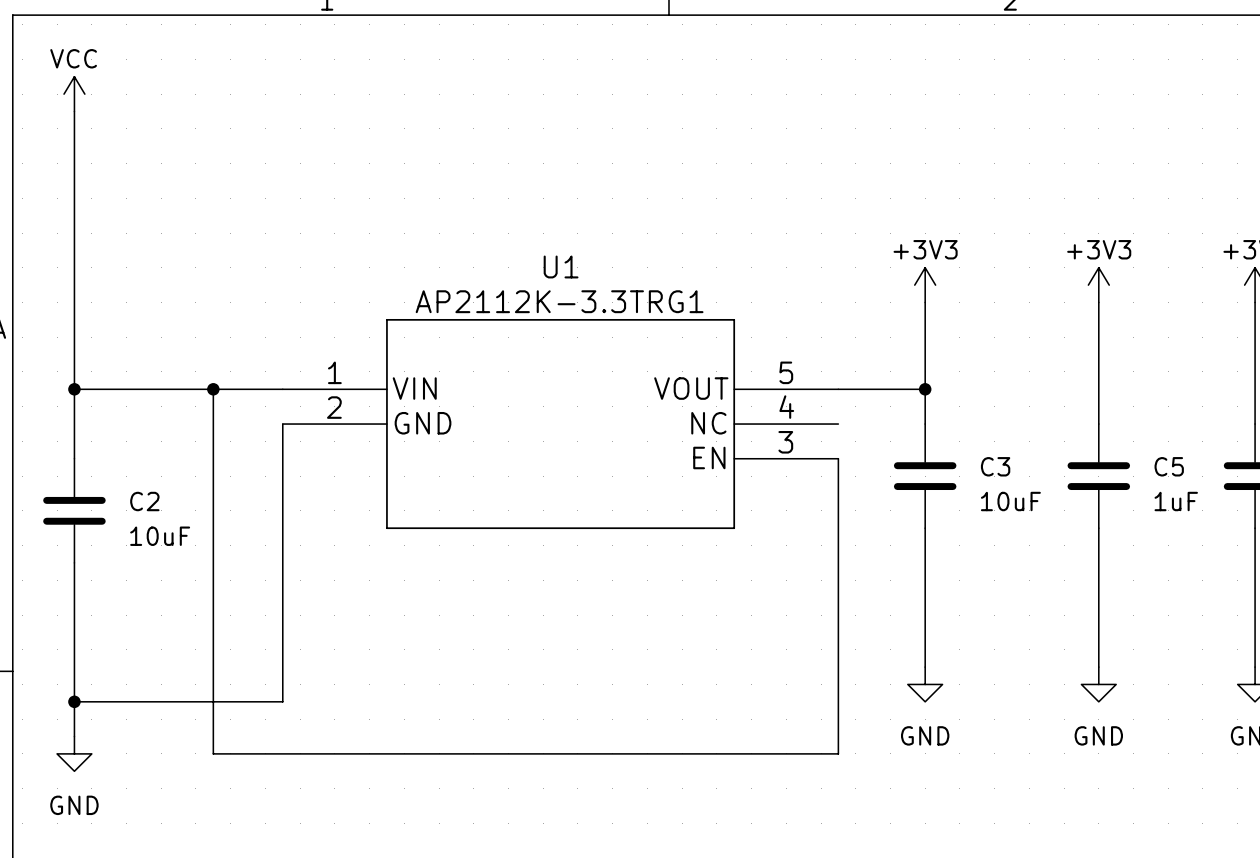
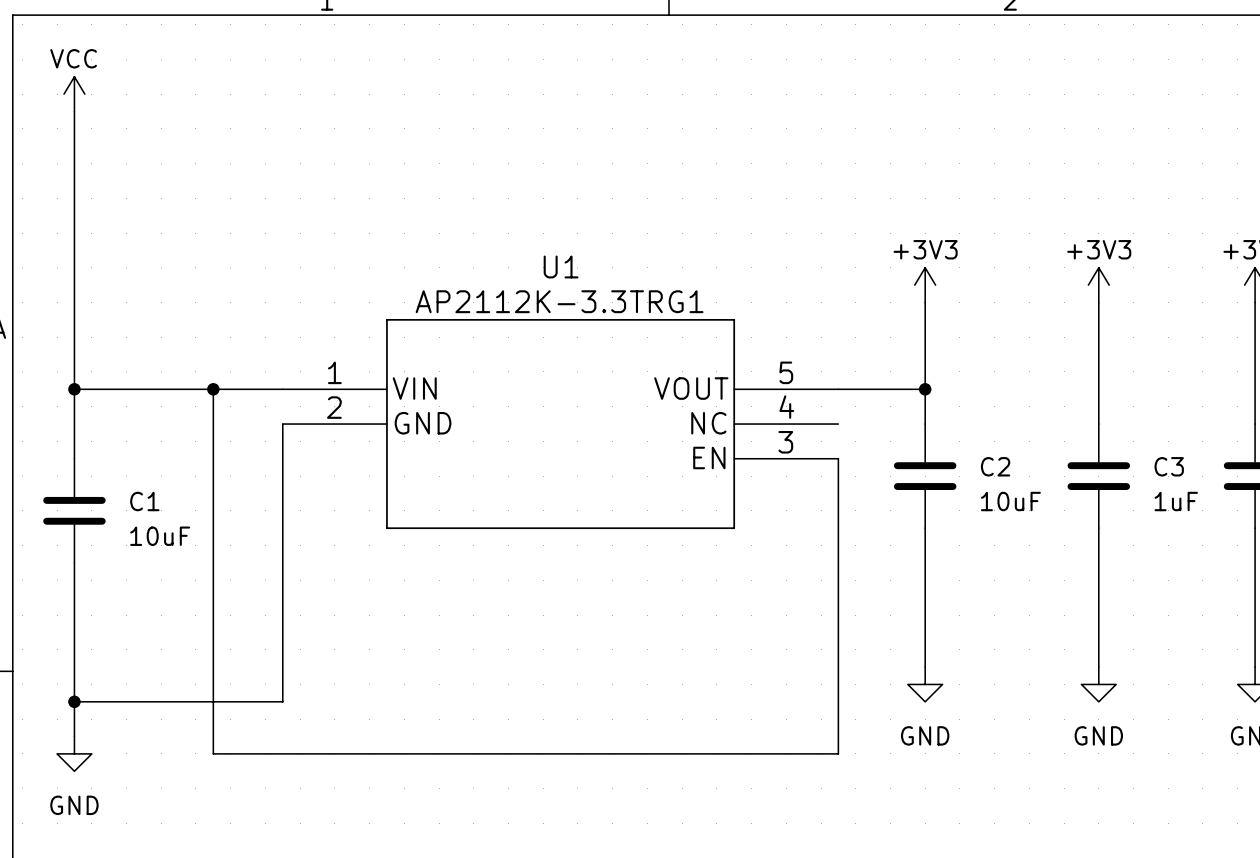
C3 name: C3 (995, 466) -> C2 (995, 466)
C5 name: C5 (1169, 466) -> C3 (1169, 466)
C2 name: C2 (144, 501) -> C1 (144, 501)

